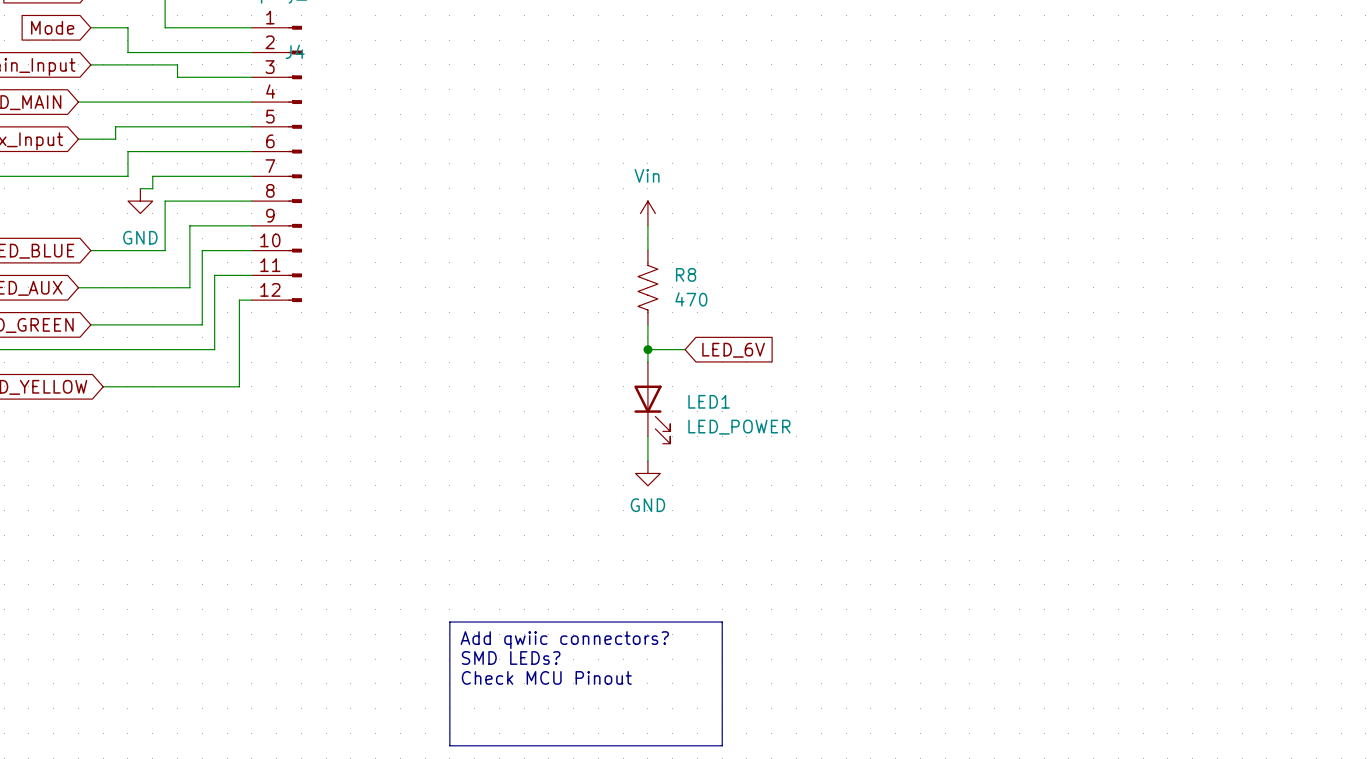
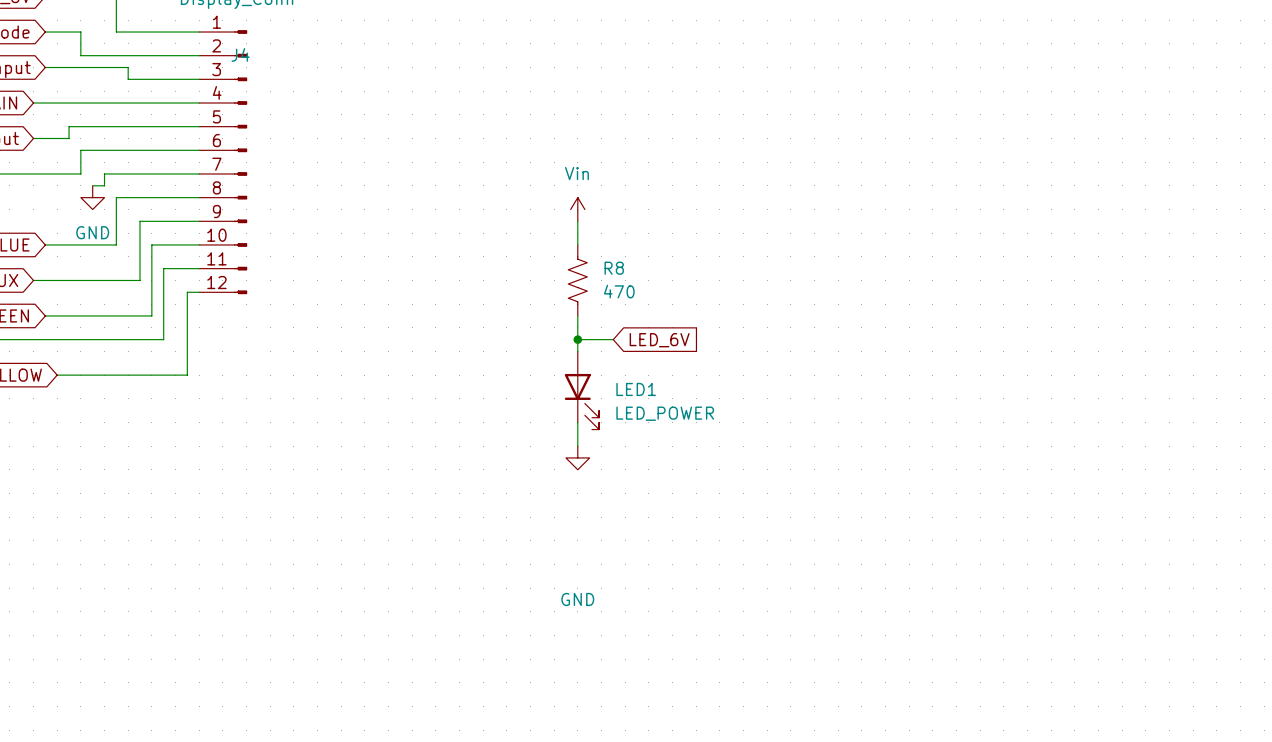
power symbol text position: GND (647, 505) -> GND (577, 599)
line: (449, 622) (722, 622) (722, 745) (449, 745) (449, 622) -> none
text: Add qwiic connectors? (564, 640) -> none
text: SMD LEDs? (511, 658) -> none
text: Check MCU Pinout (546, 677) -> none

